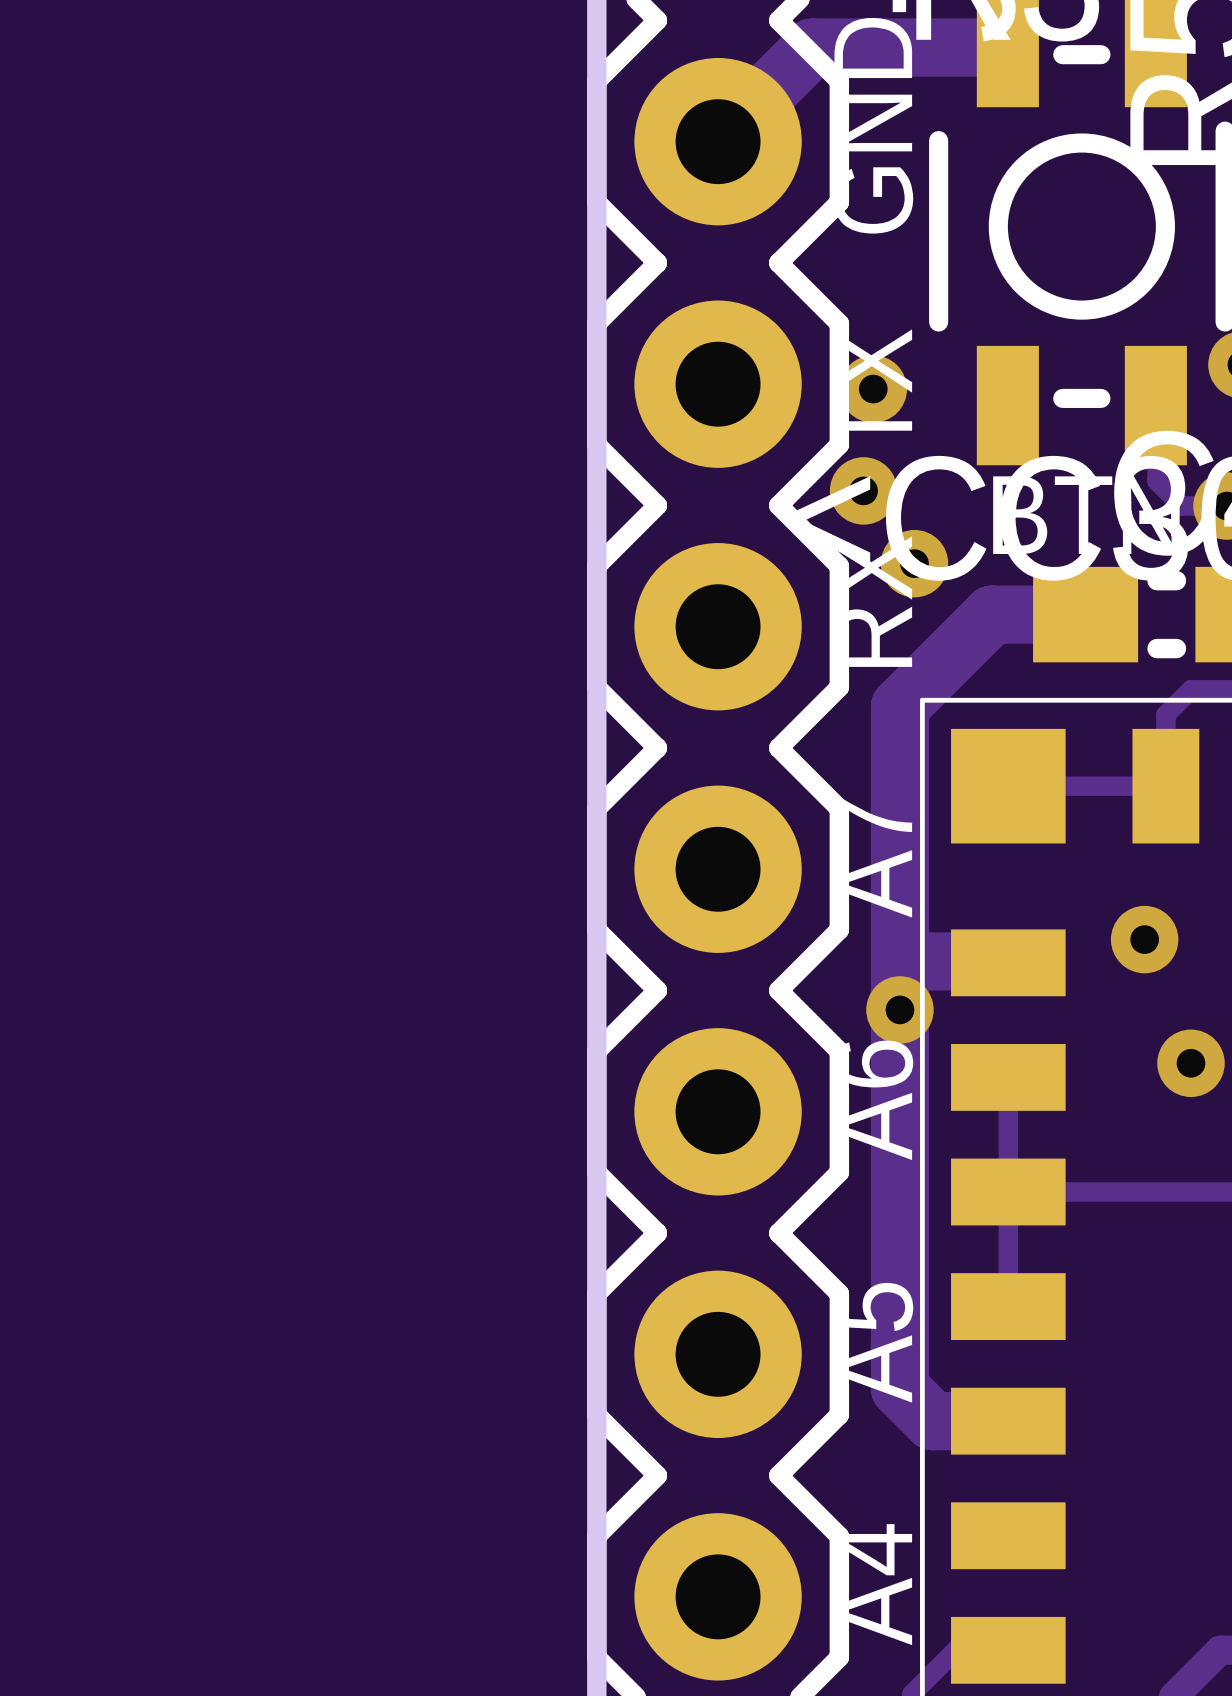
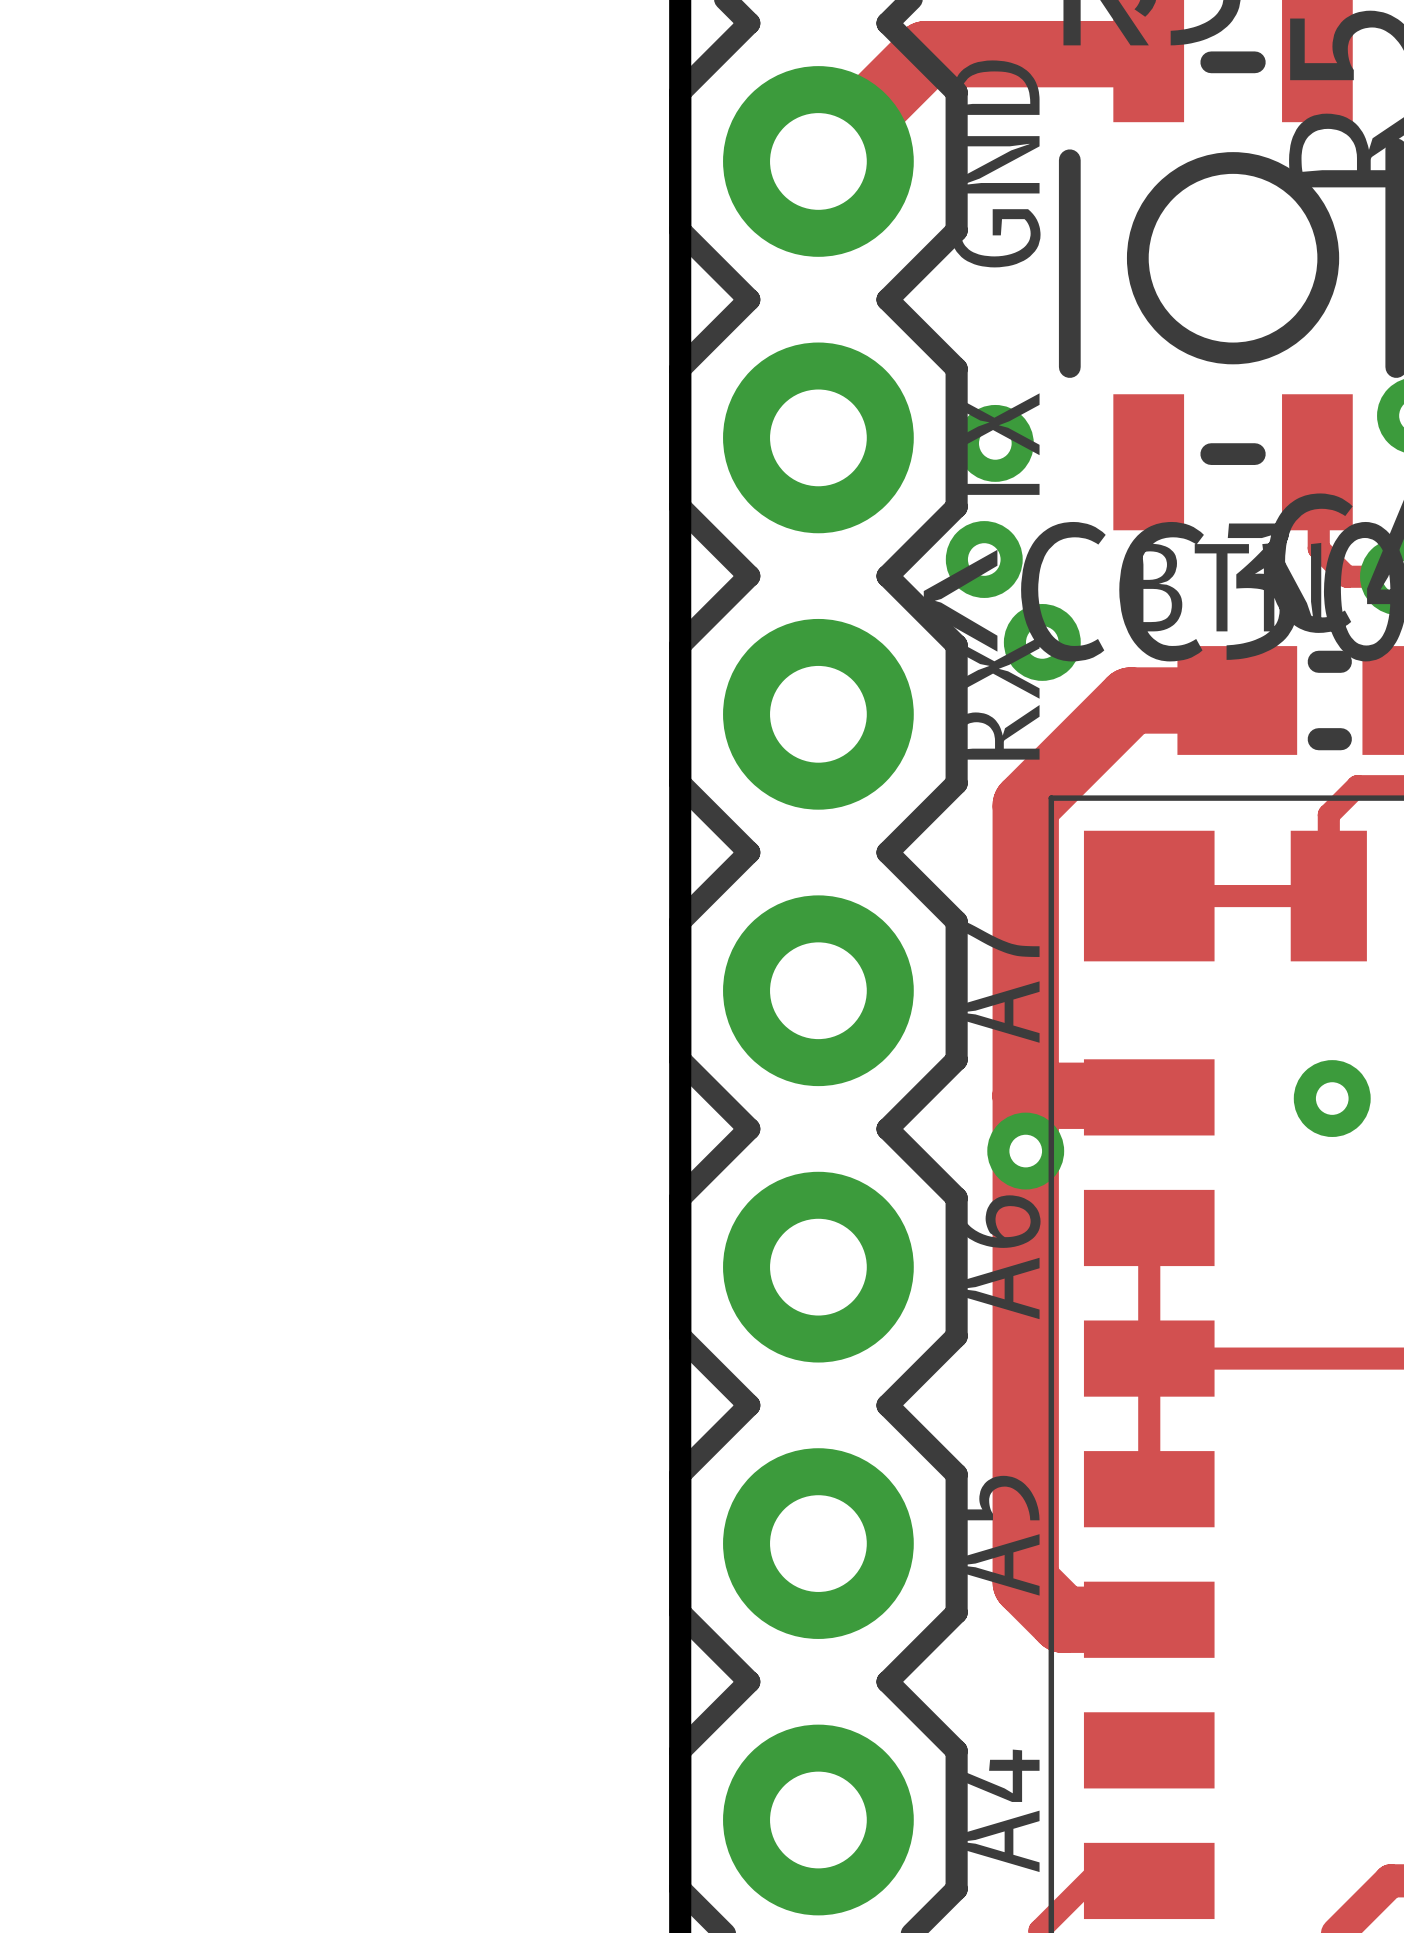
via position: (1144, 939) -> (1332, 1098)
via: (1191, 1063) -> none

